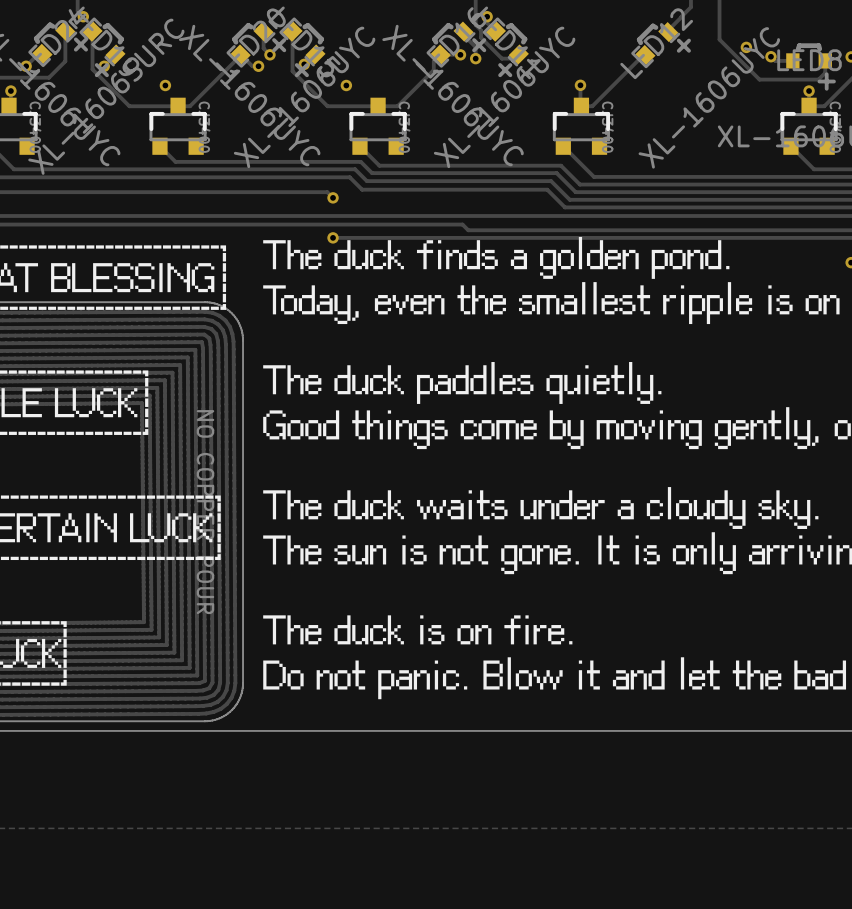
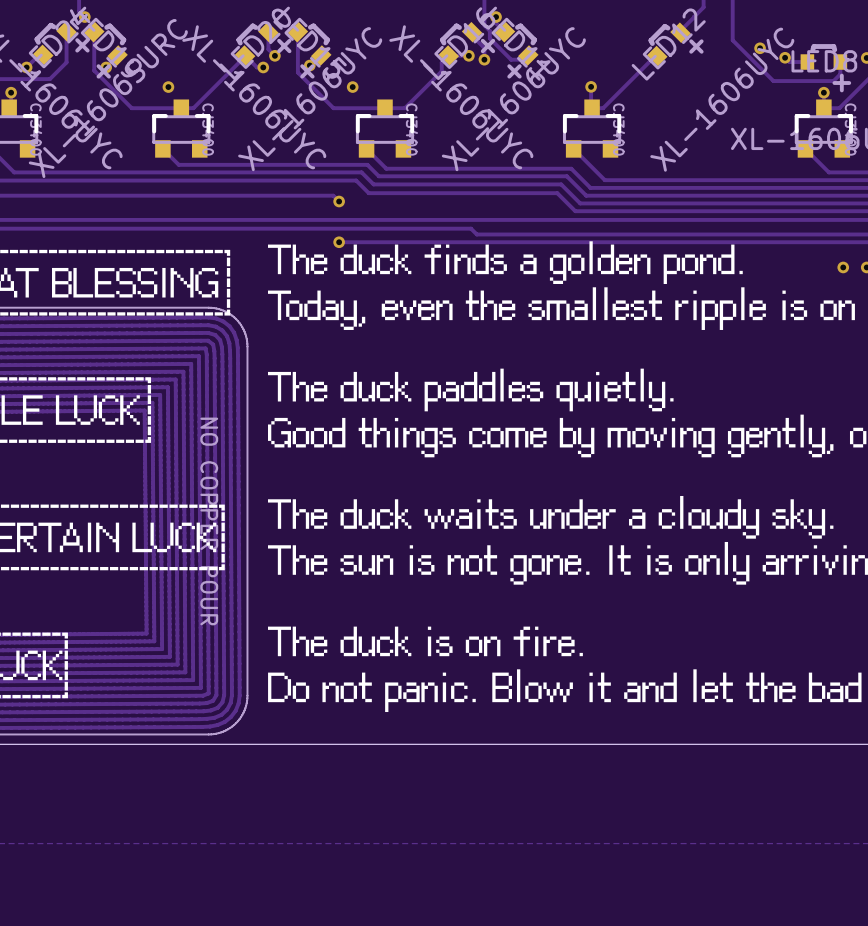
via: none -> (843, 267)

